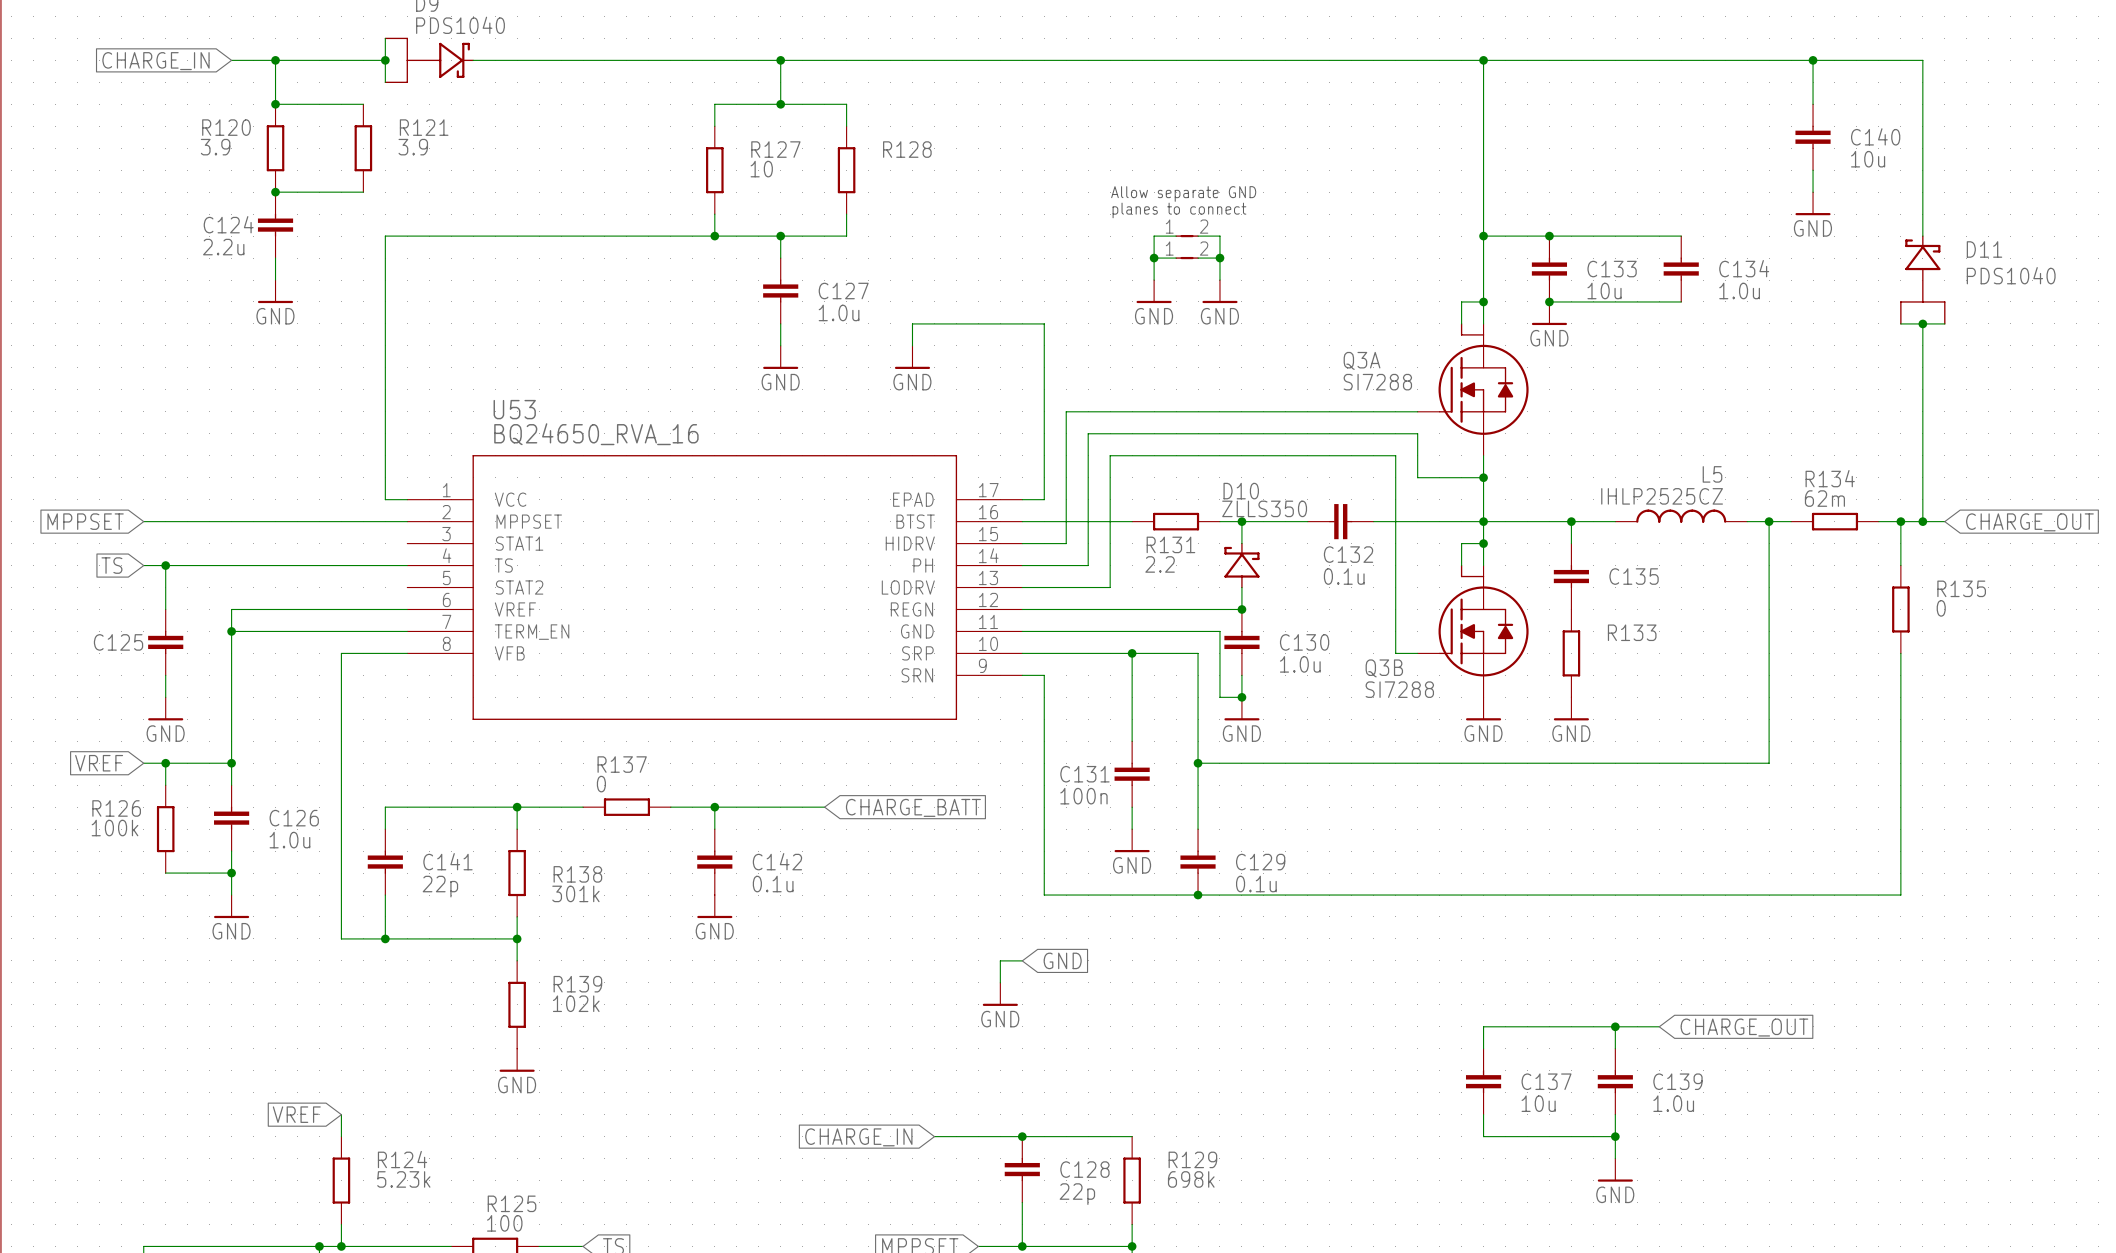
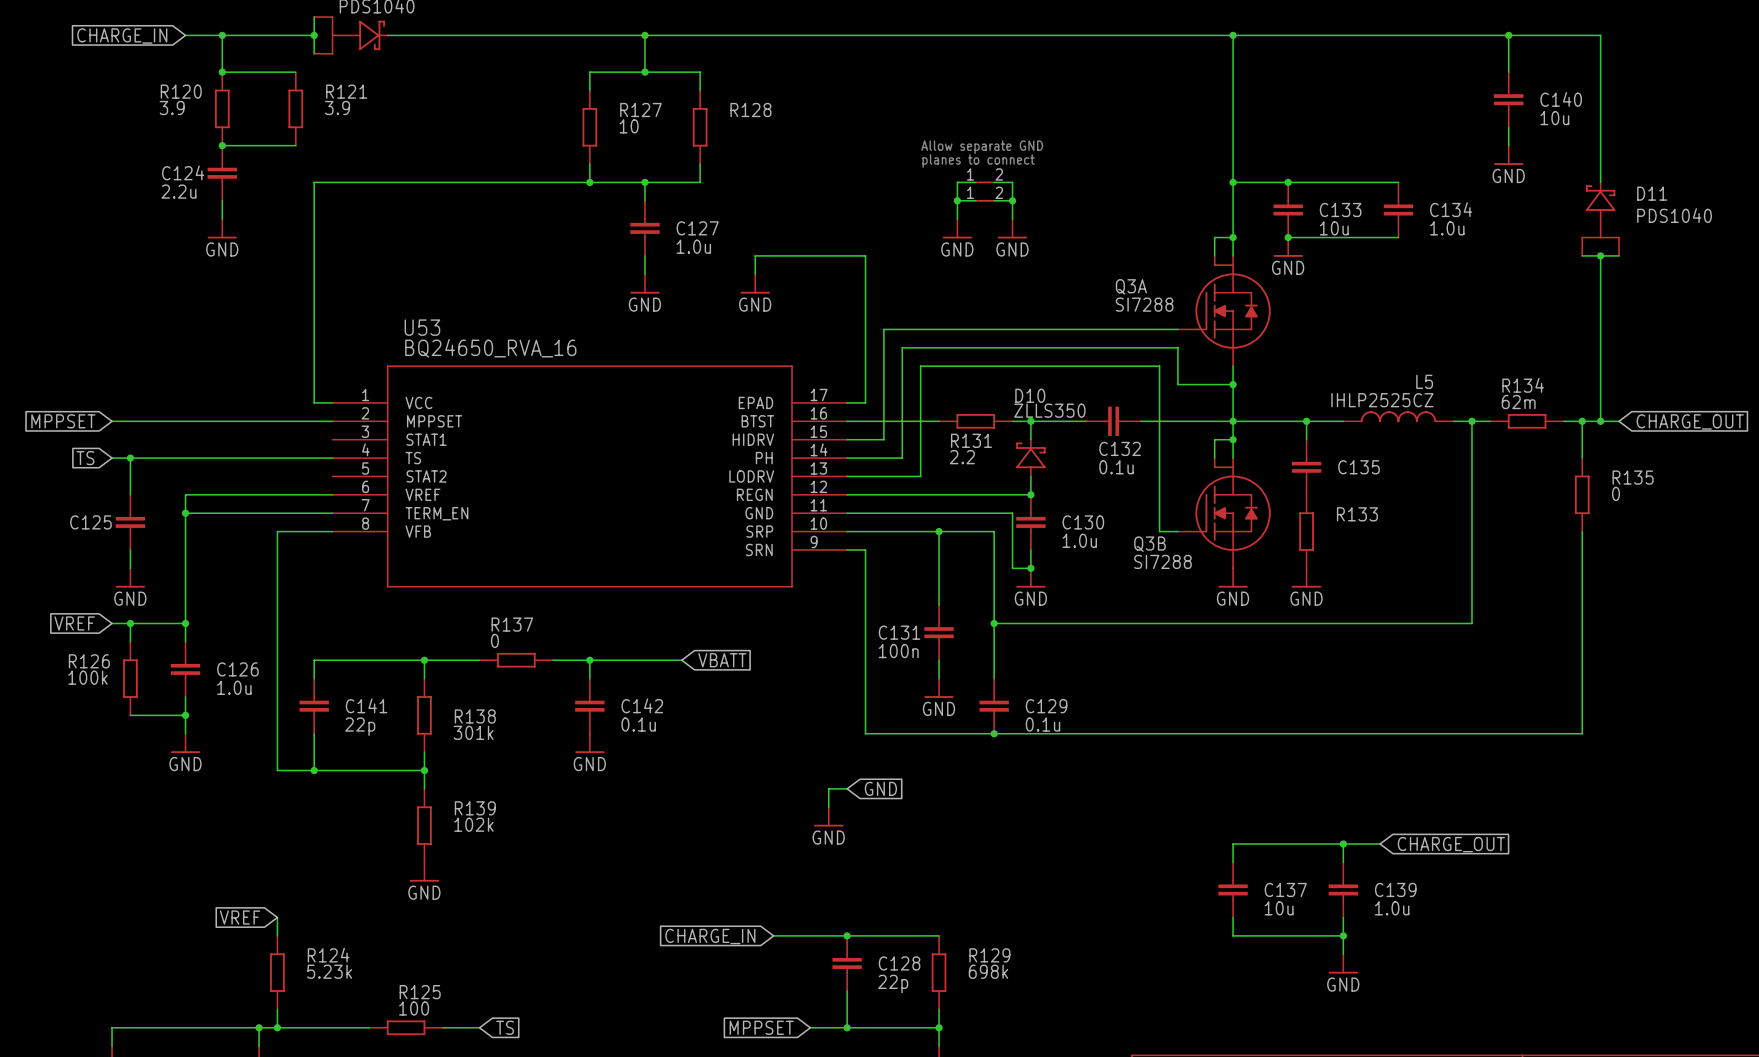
global label: CHARGE_BATT (913, 807) -> VBATT (722, 660)

